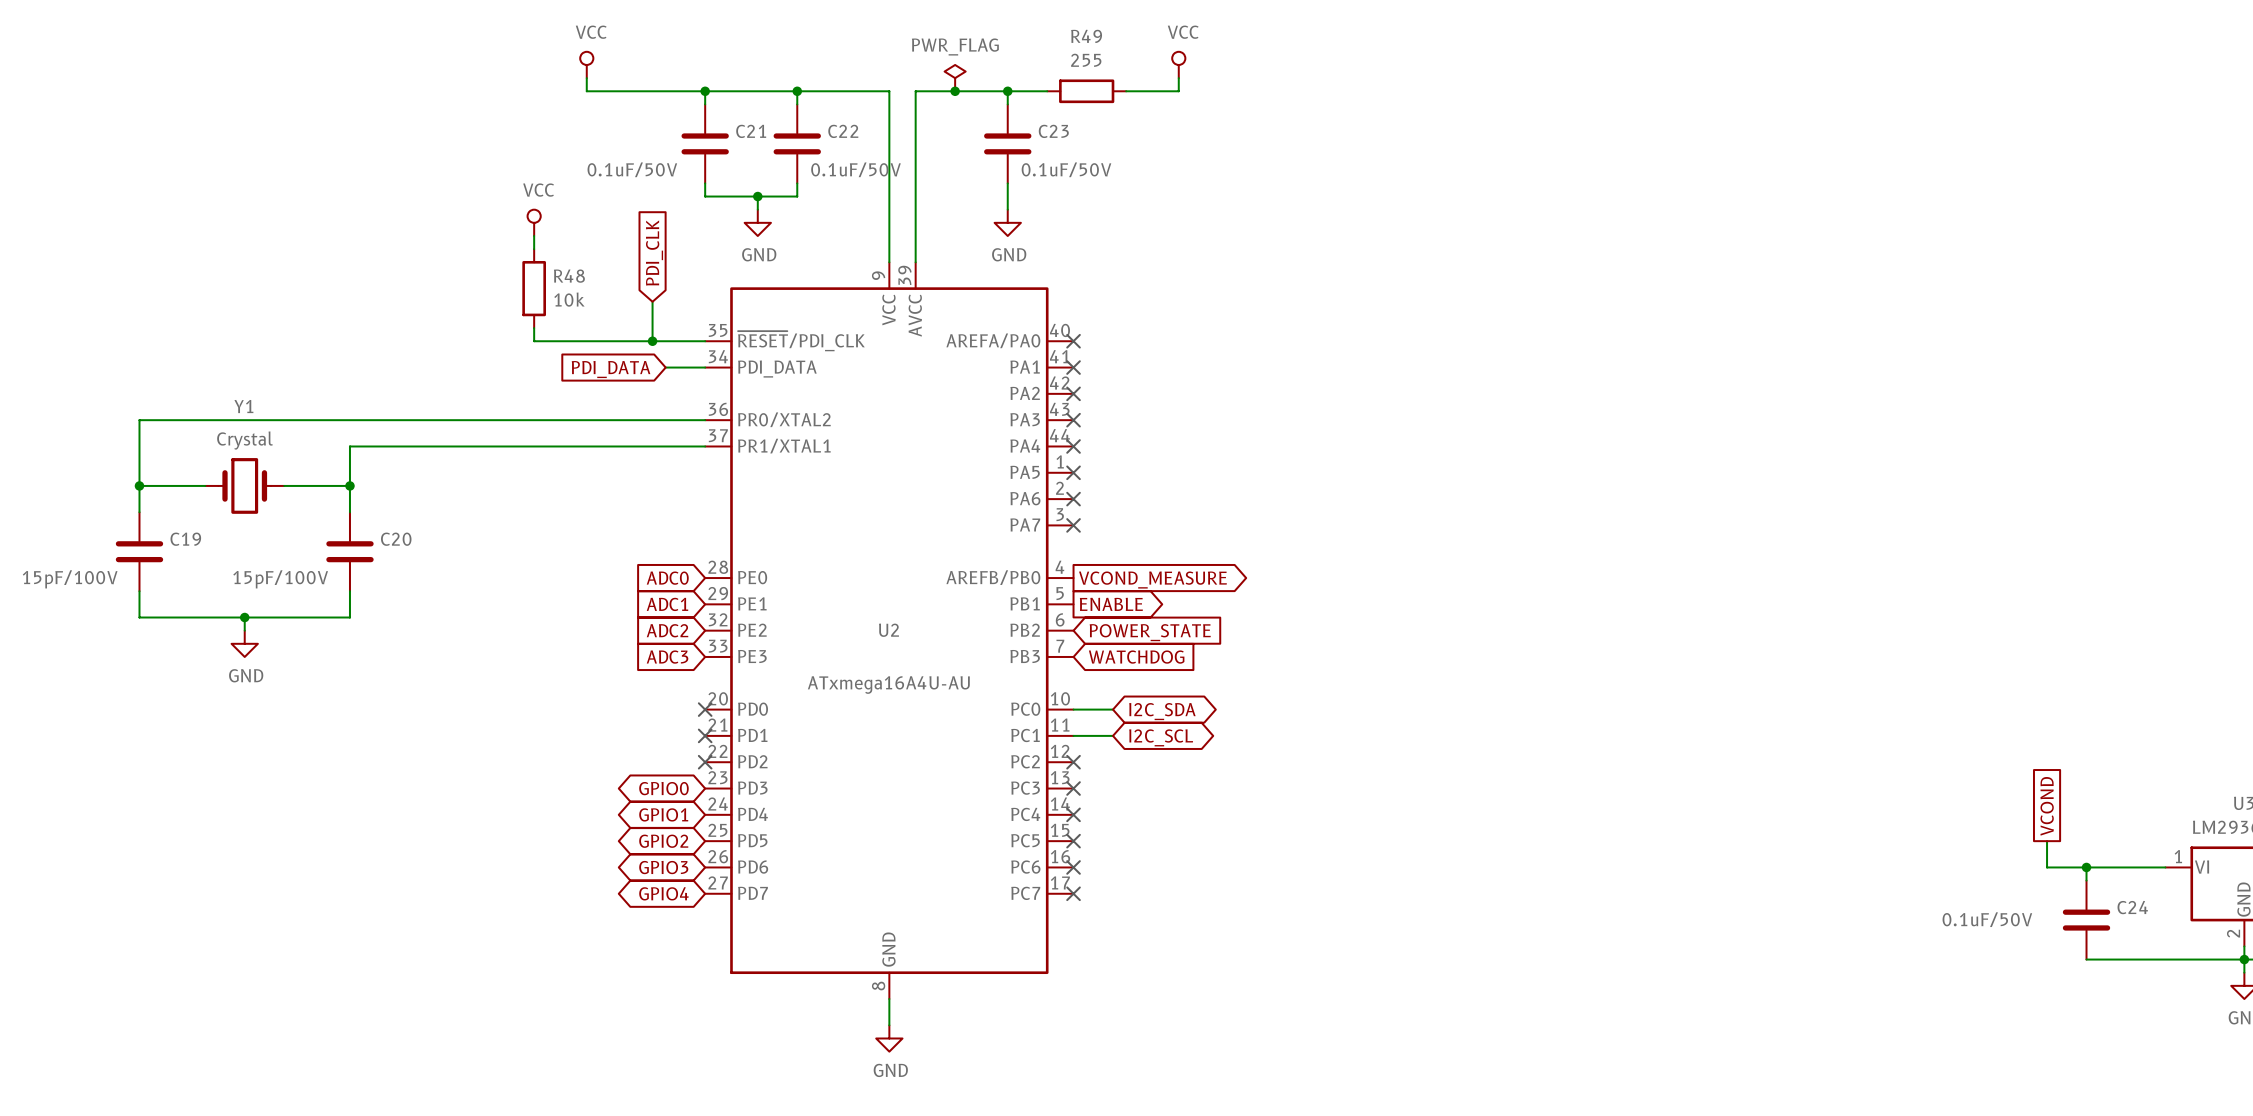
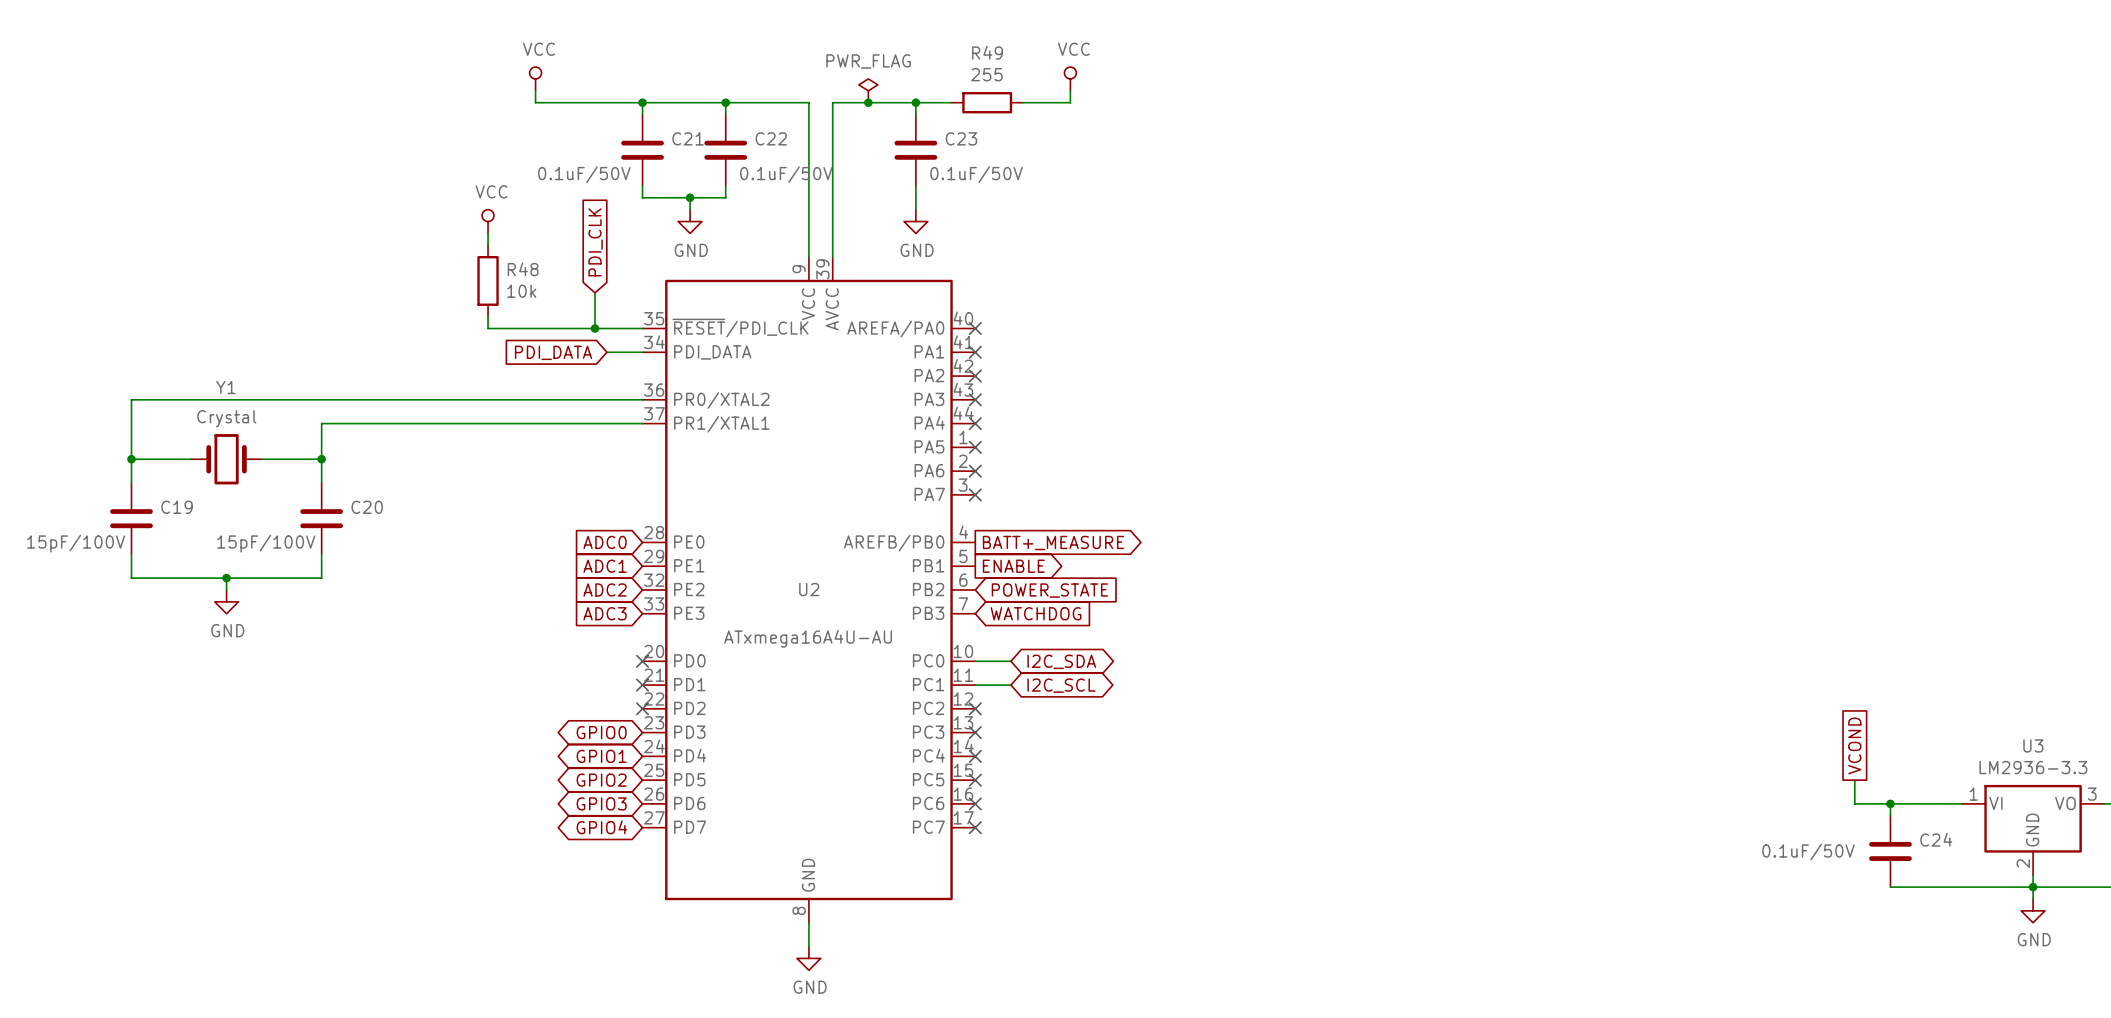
global label: VCOND_MEASURE (1152, 580) -> BATT+_MEASURE (1053, 543)

